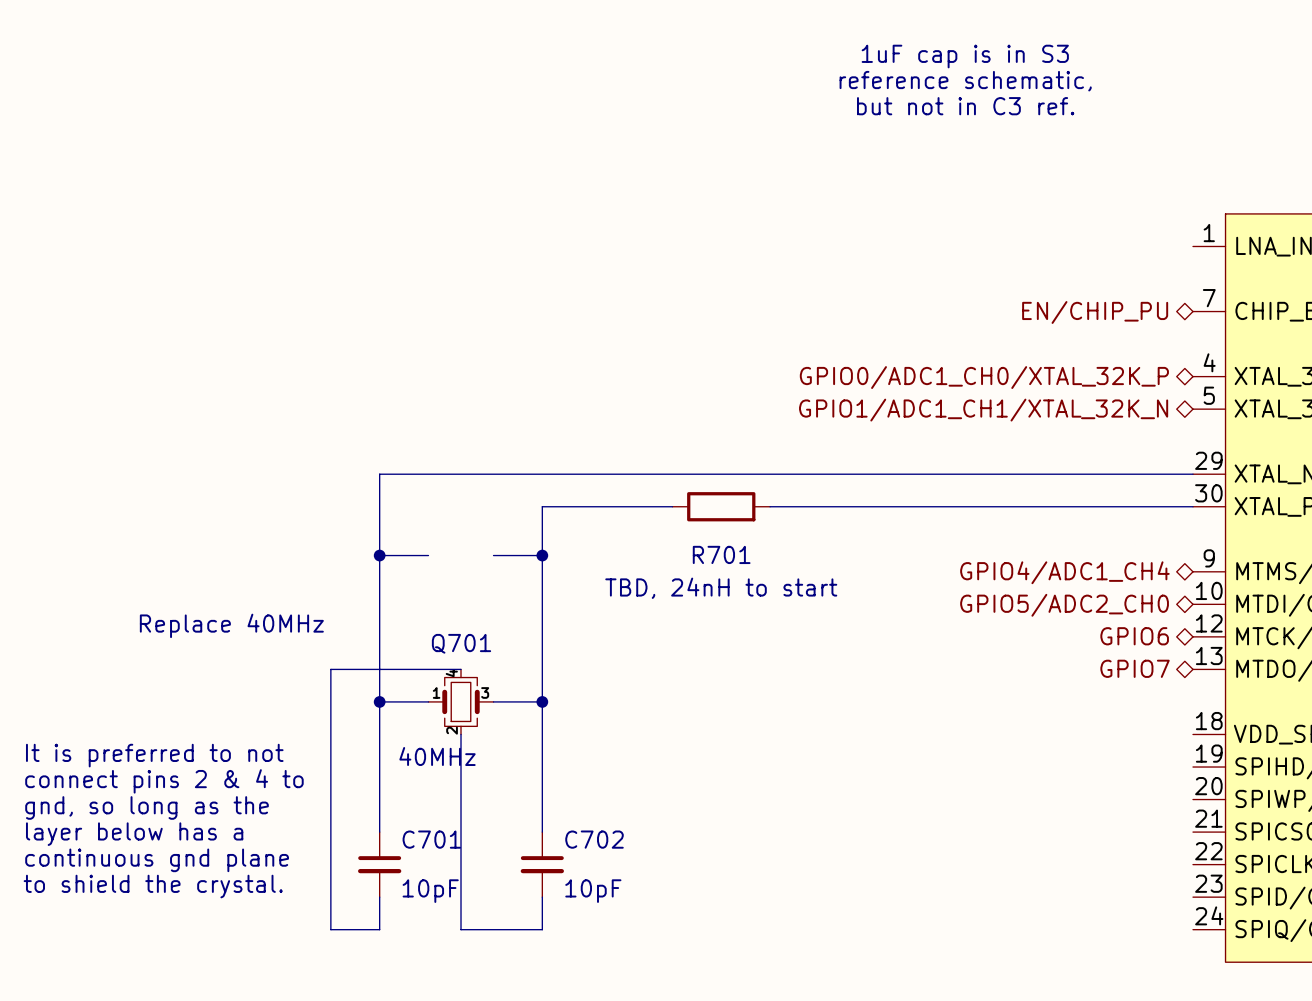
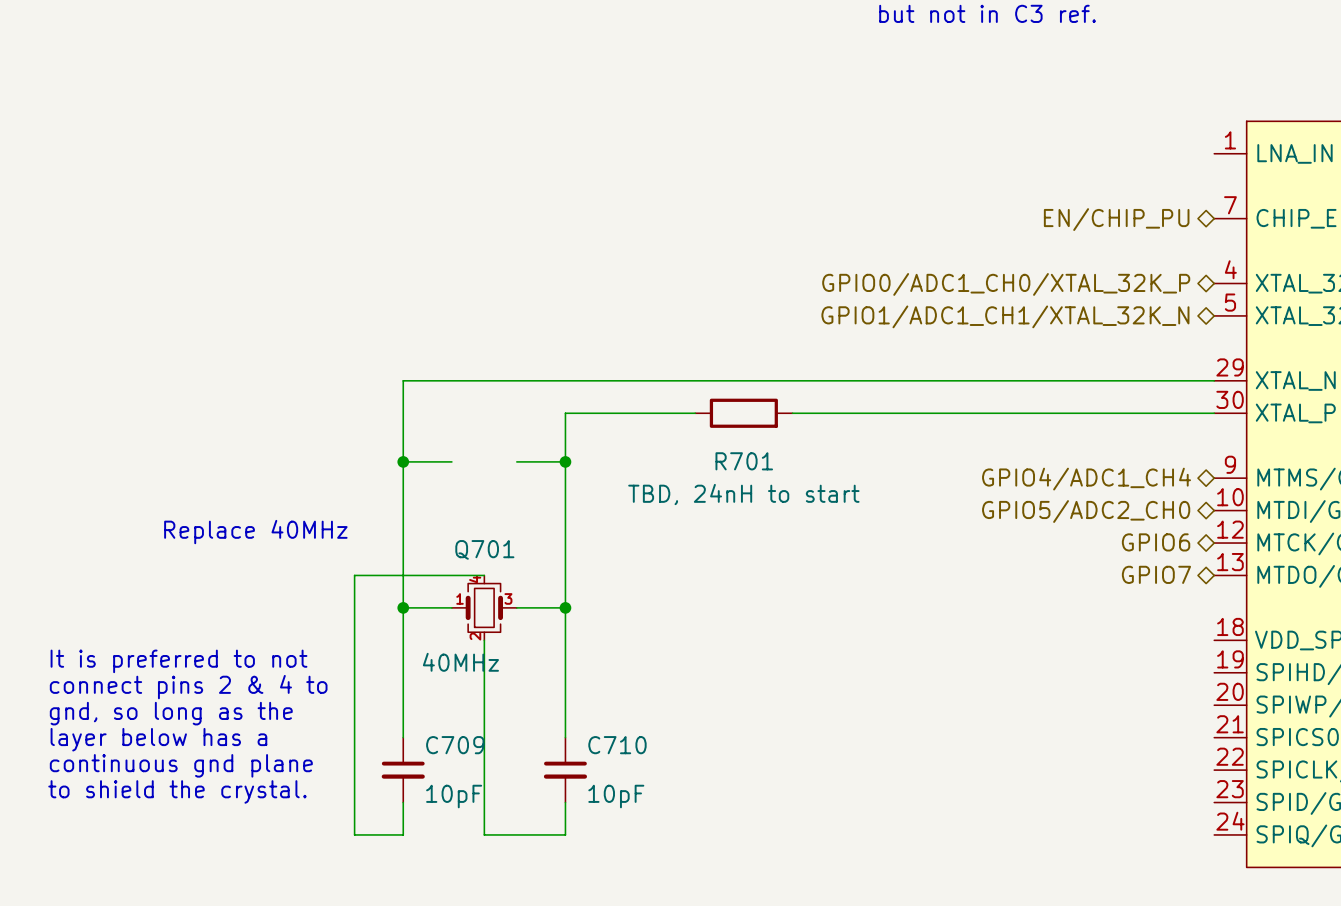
C701 name: C701 (431, 839) -> C709 (455, 745)
C702 name: C702 (594, 839) -> C710 (617, 745)

